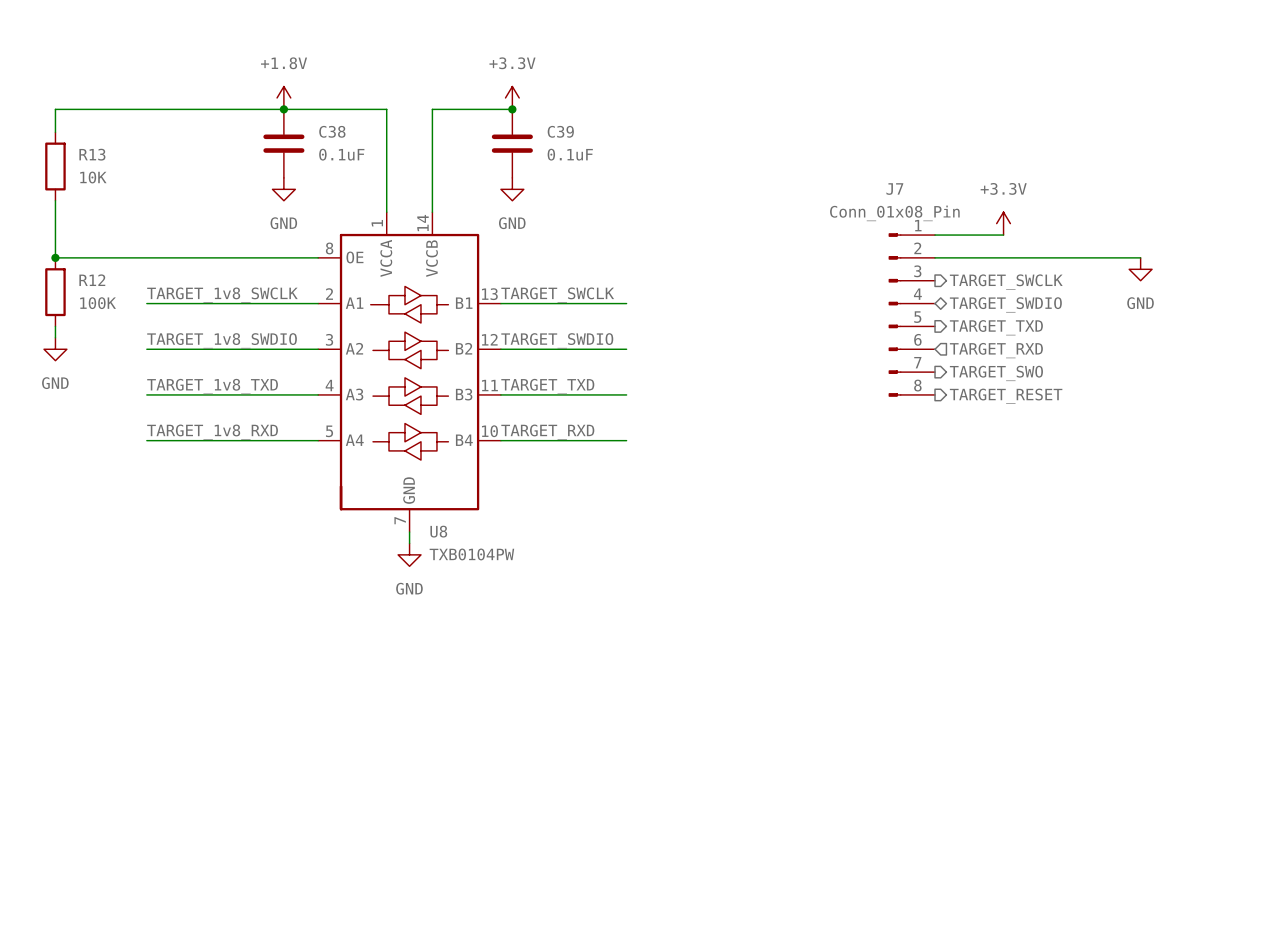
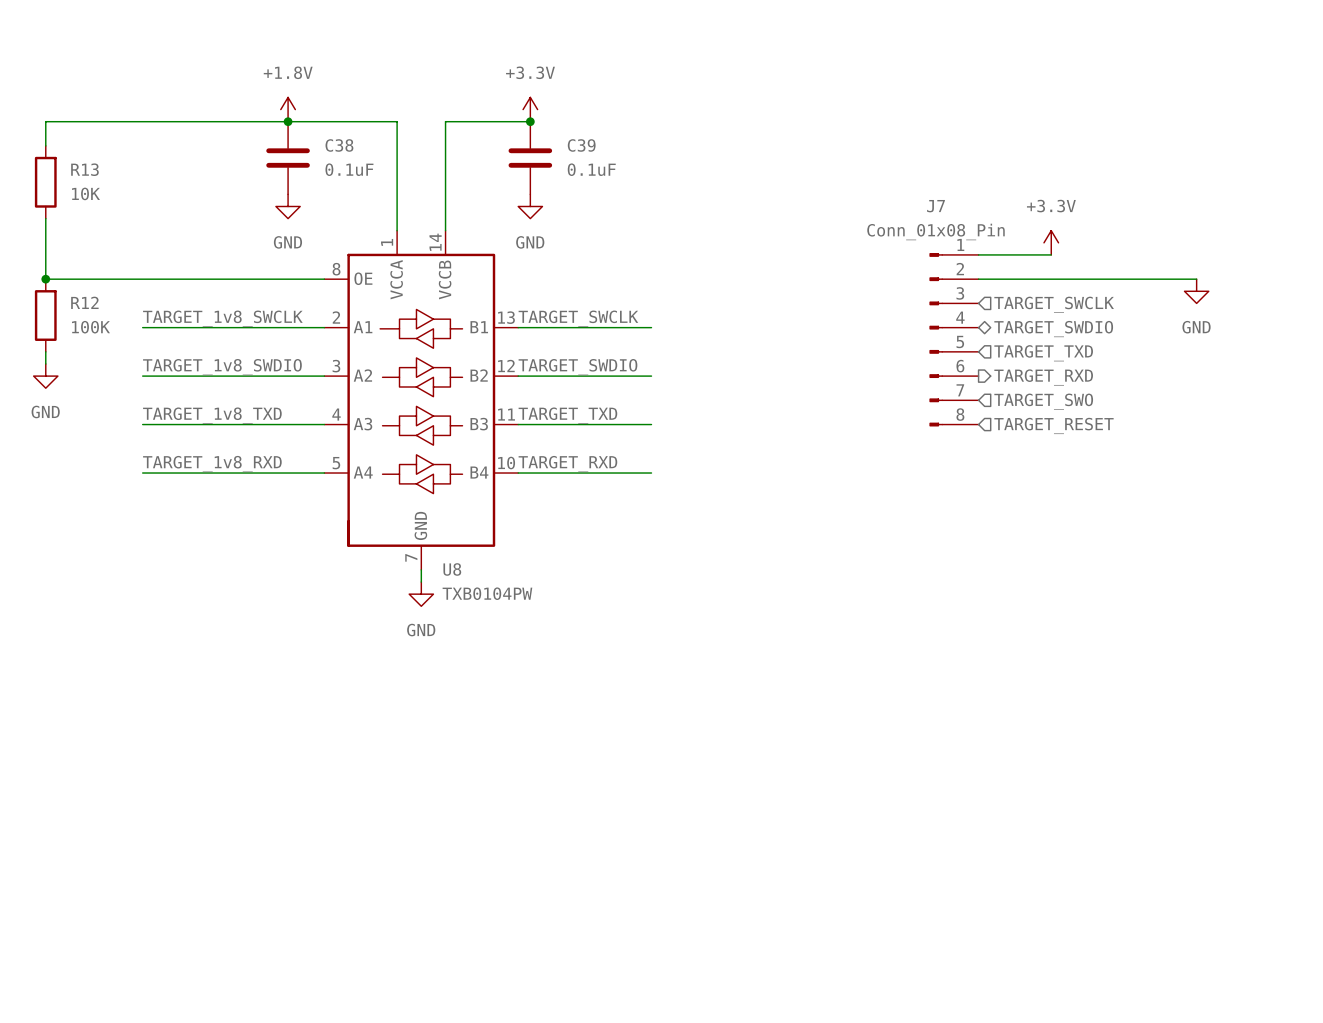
hierarchical label shape: output (1006, 282) -> input (1054, 304)
hierarchical label shape: output (996, 327) -> input (1043, 353)
hierarchical label shape: input (996, 350) -> output (1043, 377)
hierarchical label shape: output (996, 373) -> input (1043, 401)
hierarchical label shape: output (1006, 396) -> input (1053, 425)

